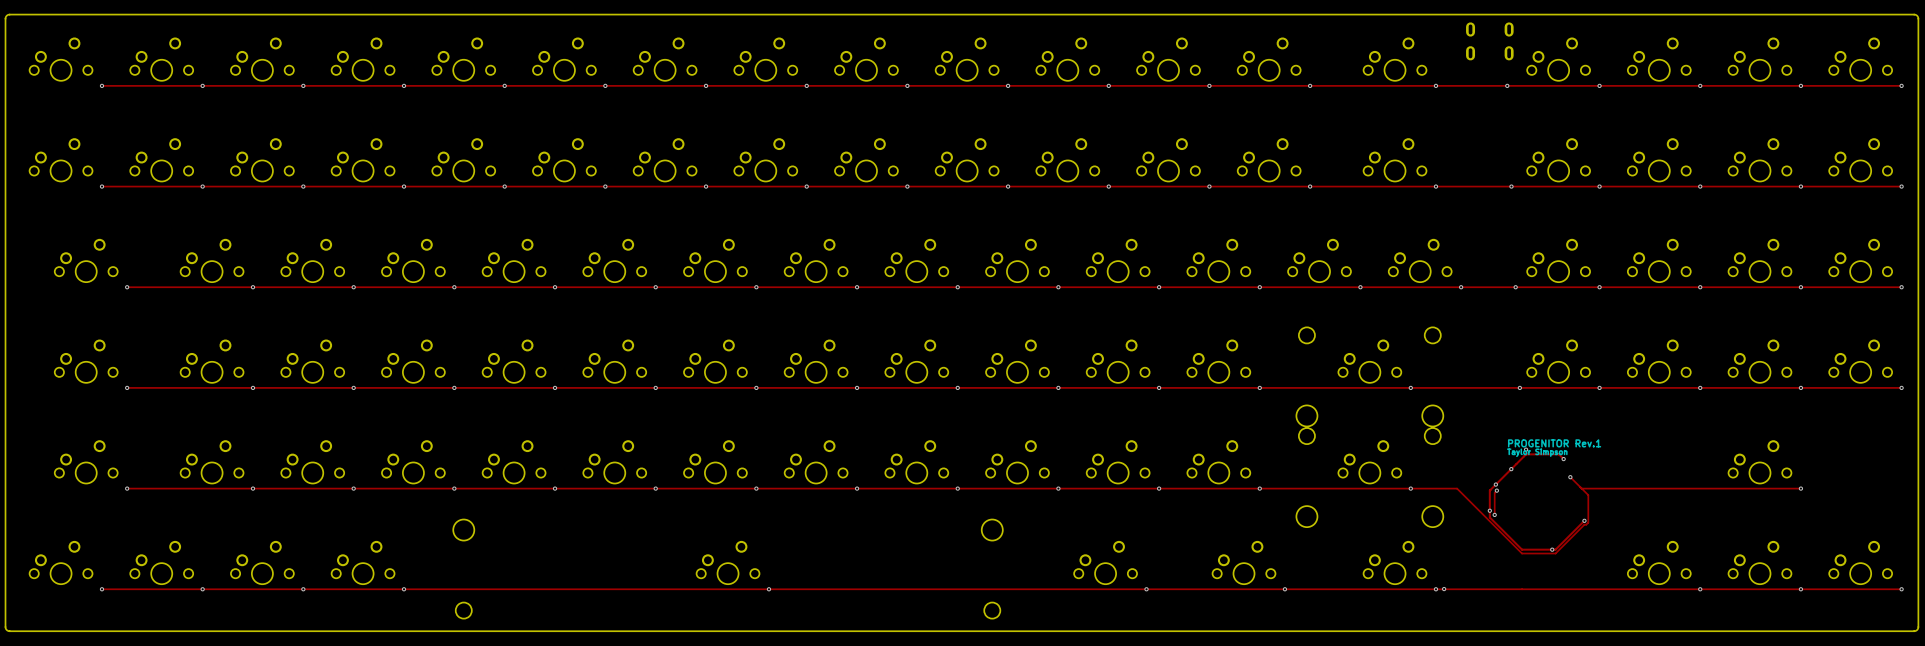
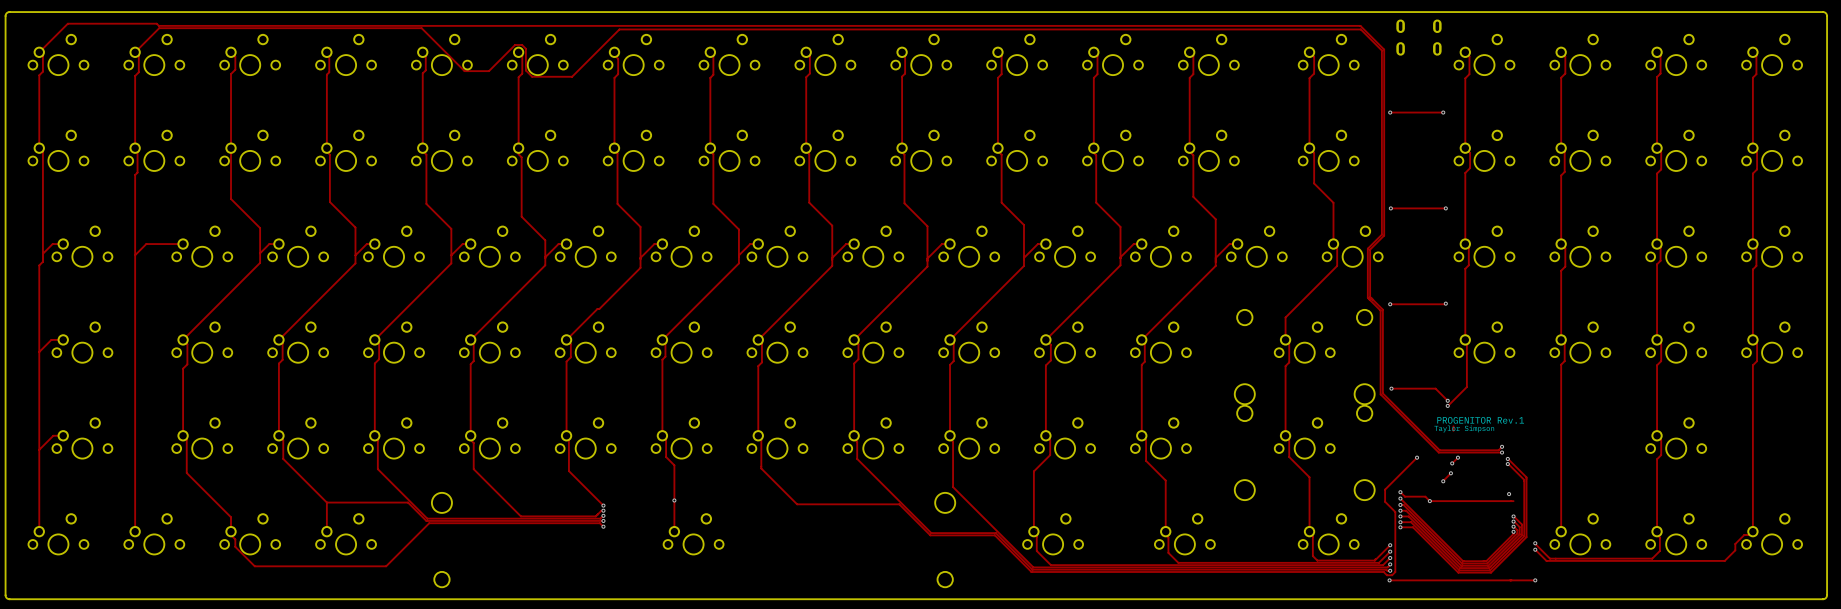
track: none -> (231, 52) (235, 56) (235, 69) (231, 74) (231, 198) (260, 228) (260, 262) (183, 339) (187, 344) (187, 364) (183, 368) (183, 435) (186, 439) (186, 473) (231, 517) (231, 535) (235, 539) (235, 546) (254, 566) (386, 566) (429, 523) (599, 523) (603, 526)
track: none -> (326, 52) (329, 54) (329, 72) (326, 74) (326, 151) (329, 154) (329, 202) (355, 227) (355, 263) (278, 339) (282, 343) (282, 359) (278, 363) (278, 435) (283, 440) (283, 458) (326, 502)
track: none -> (422, 52) (425, 55) (425, 70) (422, 73) (422, 151) (426, 154) (426, 203) (451, 228) (451, 263) (374, 339) (379, 344) (379, 359) (374, 363) (374, 438) (377, 441) (377, 469) (427, 518) (600, 518) (603, 515)
track: none -> (518, 52) (522, 55) (522, 73) (518, 77) (518, 154) (521, 157) (521, 216) (545, 240) (545, 265) (470, 339) (473, 342) (473, 361) (470, 364) (470, 439) (473, 442) (473, 469) (520, 516) (595, 516) (603, 510)
track: none -> (614, 52) (618, 58) (618, 74) (614, 77) (614, 150) (617, 153) (617, 203) (640, 226) (640, 267) (566, 339) (570, 344) (570, 357) (566, 361) (566, 437) (568, 439) (568, 471) (603, 505)
track: none -> (710, 52) (713, 55) (713, 74) (710, 77) (710, 151) (713, 154) (713, 203) (738, 229) (738, 263) (662, 339) (665, 342) (665, 356) (662, 359) (662, 435) (666, 439) (666, 457) (674, 465) (674, 531)
track: none -> (806, 52) (809, 55) (809, 73) (806, 77) (806, 151) (809, 154) (809, 202) (832, 225) (832, 265) (758, 339) (761, 343) (761, 362) (758, 366) (758, 437) (761, 440) (761, 468) (797, 504) (899, 504) (930, 535) (994, 535) (1031, 571)
track: none -> (902, 52) (905, 55) (905, 73) (902, 76) (904, 203) (927, 226) (927, 266) (854, 339) (858, 344) (858, 359) (854, 363) (854, 438) (857, 441) (857, 458) (931, 533) (995, 533) (1032, 569) (1390, 570)
track: none -> (997, 52) (1001, 55) (1001, 74) (997, 77) (997, 151) (1001, 154) (1001, 202) (1023, 225) (1023, 265) (950, 339) (953, 343) (953, 361) (950, 364) (950, 438) (953, 441) (953, 487) (1033, 567) (1387, 567) (1390, 565)
track: none -> (1189, 52) (1193, 55) (1193, 74) (1189, 77) (1189, 151) (1193, 155) (1193, 196) (1215, 219) (1215, 265) (1141, 339) (1144, 342) (1144, 361) (1141, 364) (1141, 435) (1146, 440) (1146, 460) (1165, 480) (1165, 534) (1168, 537) (1168, 552) (1178, 562) (1378, 562) (1390, 551)
track: none -> (1309, 52) (1314, 56) (1314, 73) (1309, 78) (1309, 148) (1314, 152) (1314, 183) (1333, 202) (1333, 244) (1337, 247) (1337, 265) (1285, 317) (1285, 339) (1289, 343) (1289, 362) (1285, 366) (1285, 435) (1289, 439) (1289, 457) (1309, 477) (1309, 534)
track: none -> (1465, 52) (1469, 56) (1469, 74) (1465, 78) (1465, 148) (1470, 152) (1470, 168) (1465, 172) (1465, 244) (1468, 247) (1468, 265) (1465, 268) (1466, 387) (1447, 405)
track: none -> (1561, 52) (1565, 56) (1565, 73) (1561, 77) (1561, 148) (1564, 151) (1564, 171) (1561, 175) (1561, 244) (1565, 248) (1565, 266) (1561, 270) (1561, 339) (1564, 343) (1564, 361) (1561, 364) (1561, 531)
track: none -> (1657, 52) (1660, 55) (1660, 73) (1657, 77) (1657, 148) (1661, 152) (1661, 169) (1657, 173) (1657, 244) (1660, 247) (1660, 260) (1657, 264) (1657, 339) (1661, 344) (1661, 361) (1657, 365) (1657, 435) (1661, 439) (1661, 455) (1657, 459) (1657, 534) (1659, 537) (1659, 550) (1652, 558) (1549, 558) (1535, 543)
track: none -> (1752, 52) (1756, 55) (1756, 74) (1752, 77) (1752, 148) (1757, 152) (1757, 169) (1752, 173) (1752, 244) (1756, 247) (1756, 265) (1752, 269) (1752, 339) (1757, 344) (1757, 361) (1752, 365) (1752, 534) (1744, 535) (1735, 543) (1735, 550) (1724, 560) (1546, 560) (1535, 549)
track: none -> (1093, 54) (1093, 52) (1097, 55) (1097, 74) (1093, 77) (1096, 202) (1120, 226) (1120, 265) (1045, 339) (1050, 344) (1050, 360) (1045, 365) (1045, 435) (1050, 440) (1050, 455) (1033, 471) (1033, 534) (1036, 536) (1036, 550) (1050, 565) (1383, 565) (1390, 558)
track: (101, 85) (1901, 85) -> none
via: (101, 85) -> none
via: (202, 85) -> none
via: (303, 85) -> none
via: (404, 85) -> none
via: (504, 85) -> none
via: (605, 85) -> none
via: (706, 85) -> none
via: (806, 85) -> none
via: (907, 85) -> none
via: (1008, 85) -> none
via: (1108, 85) -> none
via: (1209, 85) -> none
via: (1310, 85) -> none
via: (1435, 85) -> none
via: (1507, 85) -> none
via: (1599, 85) -> none
via: (1700, 85) -> none
via: (1800, 85) -> none
via: (1901, 85) -> none
track: none -> (1390, 112) (1443, 112)
via: none -> (1390, 112)
via: none -> (1443, 112)
track: (101, 186) (1901, 186) -> none
via: (101, 186) -> none
via: (202, 186) -> none
via: (303, 186) -> none
via: (404, 186) -> none
via: (504, 186) -> none
via: (605, 186) -> none
via: (706, 186) -> none
via: (806, 186) -> none
via: (907, 186) -> none
via: (1008, 186) -> none
via: (1108, 186) -> none
via: (1209, 186) -> none
via: (1310, 186) -> none
via: (1435, 186) -> none
via: (1511, 186) -> none
via: (1599, 186) -> none
via: (1700, 186) -> none
via: (1800, 186) -> none
via: (1901, 186) -> none
track: none -> (1390, 208) (1445, 208)
via: none -> (1390, 208)
via: none -> (1445, 208)
track: none -> (63, 244) (52, 244) (42, 253)
track: none -> (183, 244) (146, 244) (135, 255)
track: none -> (278, 244) (269, 244) (260, 253)
track: none -> (374, 244) (366, 244) (355, 255)
track: none -> (470, 244) (462, 244) (451, 255)
track: none -> (566, 244) (558, 244) (545, 257)
track: none -> (662, 244) (654, 244) (640, 257)
track: none -> (758, 244) (750, 244) (738, 255)
track: none -> (854, 244) (846, 244) (832, 257)
track: none -> (950, 244) (942, 244) (927, 258)
track: none -> (1045, 244) (1037, 244) (1023, 257)
track: none -> (1141, 244) (1133, 244) (1120, 257)
track: none -> (1237, 244) (1229, 244) (1215, 257)
track: (127, 287) (1901, 287) -> none
via: (127, 287) -> none
via: (253, 287) -> none
via: (353, 287) -> none
via: (454, 287) -> none
via: (555, 287) -> none
via: (655, 287) -> none
via: (756, 287) -> none
via: (857, 287) -> none
via: (957, 287) -> none
via: (1058, 287) -> none
via: (1159, 287) -> none
via: (1259, 287) -> none
via: (1360, 287) -> none
via: (1461, 287) -> none
via: (1515, 287) -> none
via: (1599, 287) -> none
via: (1700, 287) -> none
via: (1800, 287) -> none
via: (1901, 287) -> none
track: none -> (1445, 303) (1390, 304)
via: none -> (1445, 303)
via: none -> (1390, 304)
track: none -> (63, 339) (51, 339) (39, 352)
track: (127, 387) (1901, 387) -> none
via: (127, 387) -> none
via: (253, 387) -> none
via: (353, 387) -> none
via: (454, 387) -> none
via: (555, 387) -> none
via: (655, 387) -> none
via: (756, 387) -> none
via: (857, 387) -> none
via: (957, 387) -> none
via: (1058, 387) -> none
via: (1159, 387) -> none
via: (1259, 387) -> none
via: (1410, 387) -> none
via: (1519, 387) -> none
via: (1599, 387) -> none
via: (1700, 387) -> none
via: (1800, 387) -> none
via: (1901, 387) -> none
track: none -> (1391, 388) (1435, 388) (1447, 400)
via: none -> (1391, 388)
via: none -> (1447, 400)
via: none -> (1447, 405)
via: (1526, 449) -> none
track: none -> (63, 435) (53, 435) (39, 449)
track: (1563, 459) (1558, 454) (1526, 454) (1489, 490) (1489, 517) (1522, 549) (1555, 549) (1584, 520) -> none
via: (1563, 459) -> none
via: (1511, 469) -> none
track: none -> (1502, 446) (1498, 450) (1439, 450) (1382, 393) (1382, 309) (1370, 296) (1370, 249) (1384, 235) (1384, 49) (1360, 25) (158, 25) (156, 23) (67, 23) (39, 52) (42, 55) (42, 71) (39, 75) (39, 148) (42, 151) (42, 261) (39, 265) (39, 531)
via: none -> (1502, 446)
track: (1570, 477) (1588, 495) (1588, 522) (1555, 553) (1522, 553) (1457, 488) (127, 488) -> none
via: (1570, 477) -> none
track: none -> (1502, 452) (1438, 452) (1380, 394) (1380, 310) (1367, 297) (1367, 248) (1381, 234) (1381, 50) (1360, 29) (619, 29) (572, 76) (532, 76) (525, 70) (525, 48) (522, 45) (515, 45) (488, 71) (464, 71) (421, 28) (159, 28) (135, 52) (138, 55) (138, 72) (135, 75) (135, 148) (137, 150) (137, 172) (135, 175) (135, 531)
via: none -> (1502, 452)
track: none -> (1417, 457) (1385, 489) (1385, 501) (1395, 511) (1395, 572) (1392, 575) (1387, 575) (1383, 571) (1031, 571)
via: none -> (1417, 457)
track: none -> (1457, 457) (1452, 463)
via: none -> (1457, 457)
track: none -> (1507, 458) (1526, 477) (1526, 537) (1491, 572) (1458, 572) (1413, 527) (1400, 527)
via: none -> (1507, 458)
via: (1495, 484) -> none
via: (127, 488) -> none
via: (253, 488) -> none
via: (353, 488) -> none
via: (454, 488) -> none
via: (555, 488) -> none
via: (655, 488) -> none
via: (756, 488) -> none
via: (857, 488) -> none
via: (957, 488) -> none
via: (1058, 488) -> none
via: (1159, 488) -> none
via: (1259, 488) -> none
via: (1410, 488) -> none
via: none -> (1452, 463)
track: (1581, 488) (1800, 488) -> none
via: (1800, 488) -> none
track: none -> (1507, 464) (1524, 479) (1524, 536) (1490, 570) (1459, 570) (1411, 522) (1400, 522)
via: none -> (1507, 464)
track: (1496, 490) (1494, 492) (1494, 514) -> none
via: (1496, 490) -> none
track: none -> (1450, 473) (1443, 481)
via: none -> (1450, 473)
via: none -> (1443, 481)
via: (1489, 510) -> none
via: (1494, 514) -> none
track: none -> (1400, 492) (1404, 496) (1425, 496) (1429, 501) (1513, 501)
via: none -> (1400, 492)
track: none -> (1400, 498) (1463, 561) (1486, 561) (1513, 531)
via: none -> (1400, 498)
via: none -> (674, 500)
via: none -> (1429, 501)
track: none -> (326, 502) (326, 531)
track: none -> (326, 502) (408, 502) (426, 520) (603, 520)
via: none -> (603, 505)
track: none -> (1400, 504) (1403, 504) (1462, 563) (1487, 563) (1517, 533) (1517, 530) (1513, 526)
via: none -> (1400, 504)
via: none -> (603, 510)
track: none -> (1400, 510) (1406, 510) (1461, 565) (1488, 565) (1519, 534) (1519, 527) (1513, 521)
via: none -> (1400, 510)
via: none -> (603, 515)
track: none -> (1400, 516) (1408, 516) (1460, 568) (1489, 568) (1521, 535) (1521, 524) (1513, 516)
via: none -> (1400, 516)
via: none -> (1513, 516)
via: none -> (603, 520)
via: (1552, 549) -> none
via: none -> (1513, 521)
via: none -> (1400, 522)
via: none -> (603, 526)
via: none -> (1400, 527)
via: none -> (1513, 526)
via: none -> (1513, 531)
track: none -> (1309, 533) (1312, 536) (1312, 556) (1317, 560) (1374, 560) (1390, 545)
via: none -> (1535, 543)
via: none -> (1390, 545)
via: none -> (1535, 549)
via: none -> (1390, 551)
via: none -> (1390, 558)
track: (101, 589) (1901, 589) -> none
via: (101, 589) -> none
via: (202, 589) -> none
via: (303, 589) -> none
via: (404, 589) -> none
via: (768, 589) -> none
via: (1146, 589) -> none
via: (1284, 589) -> none
via: (1435, 589) -> none
via: (1444, 589) -> none
via: (1700, 589) -> none
via: (1800, 589) -> none
via: (1901, 589) -> none
via: none -> (1390, 564)
via: none -> (1390, 570)
track: none -> (1389, 580) (1535, 580)
via: none -> (1389, 580)
via: none -> (1535, 580)

